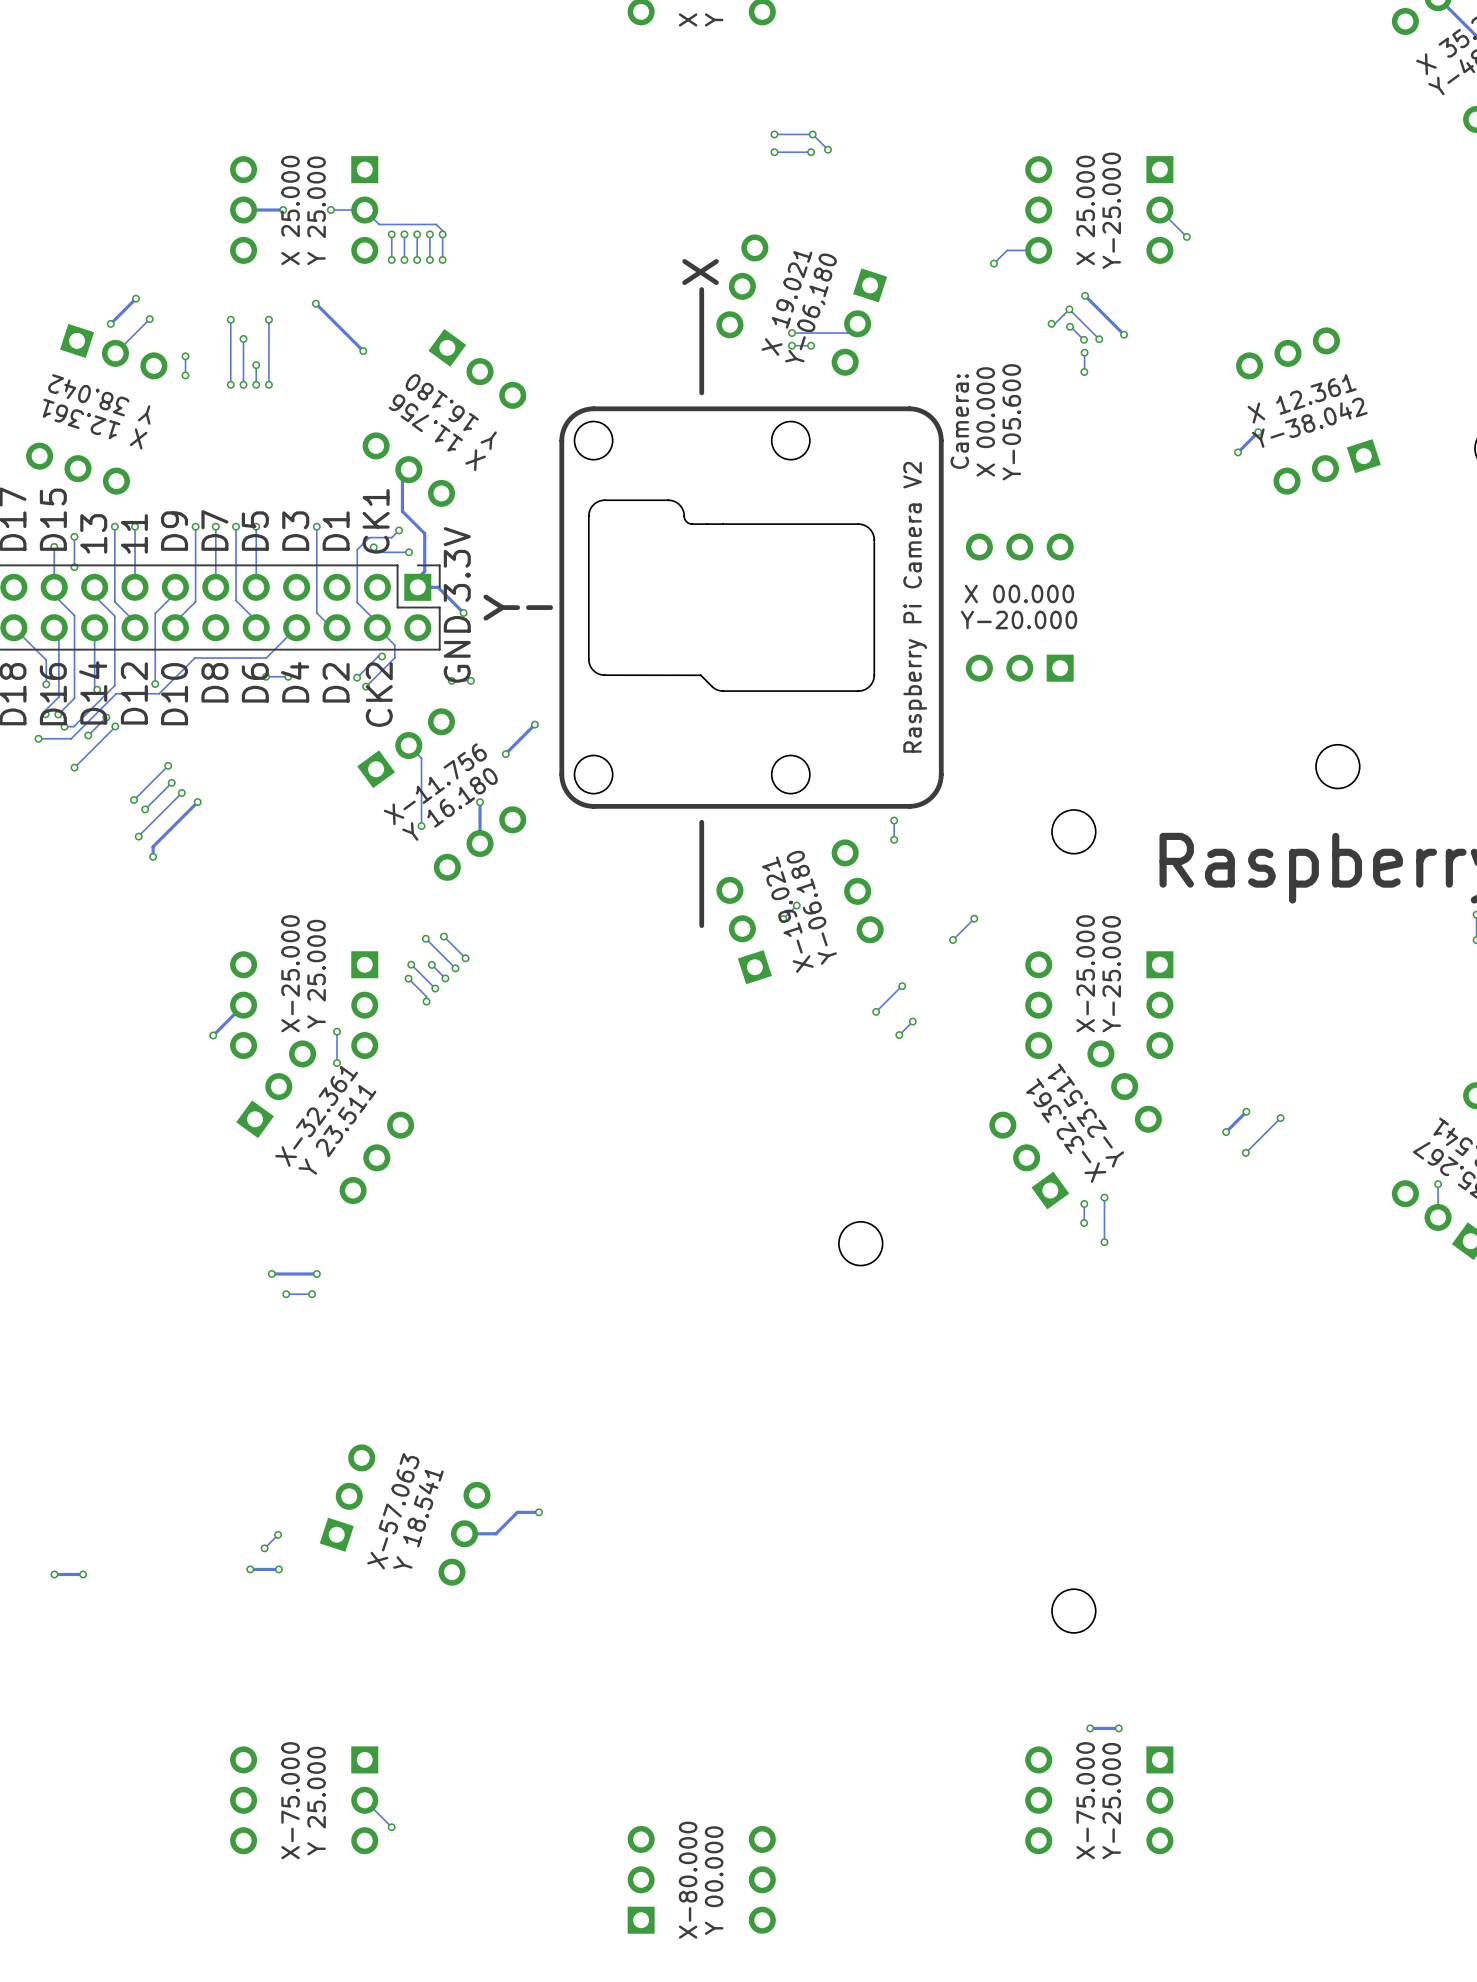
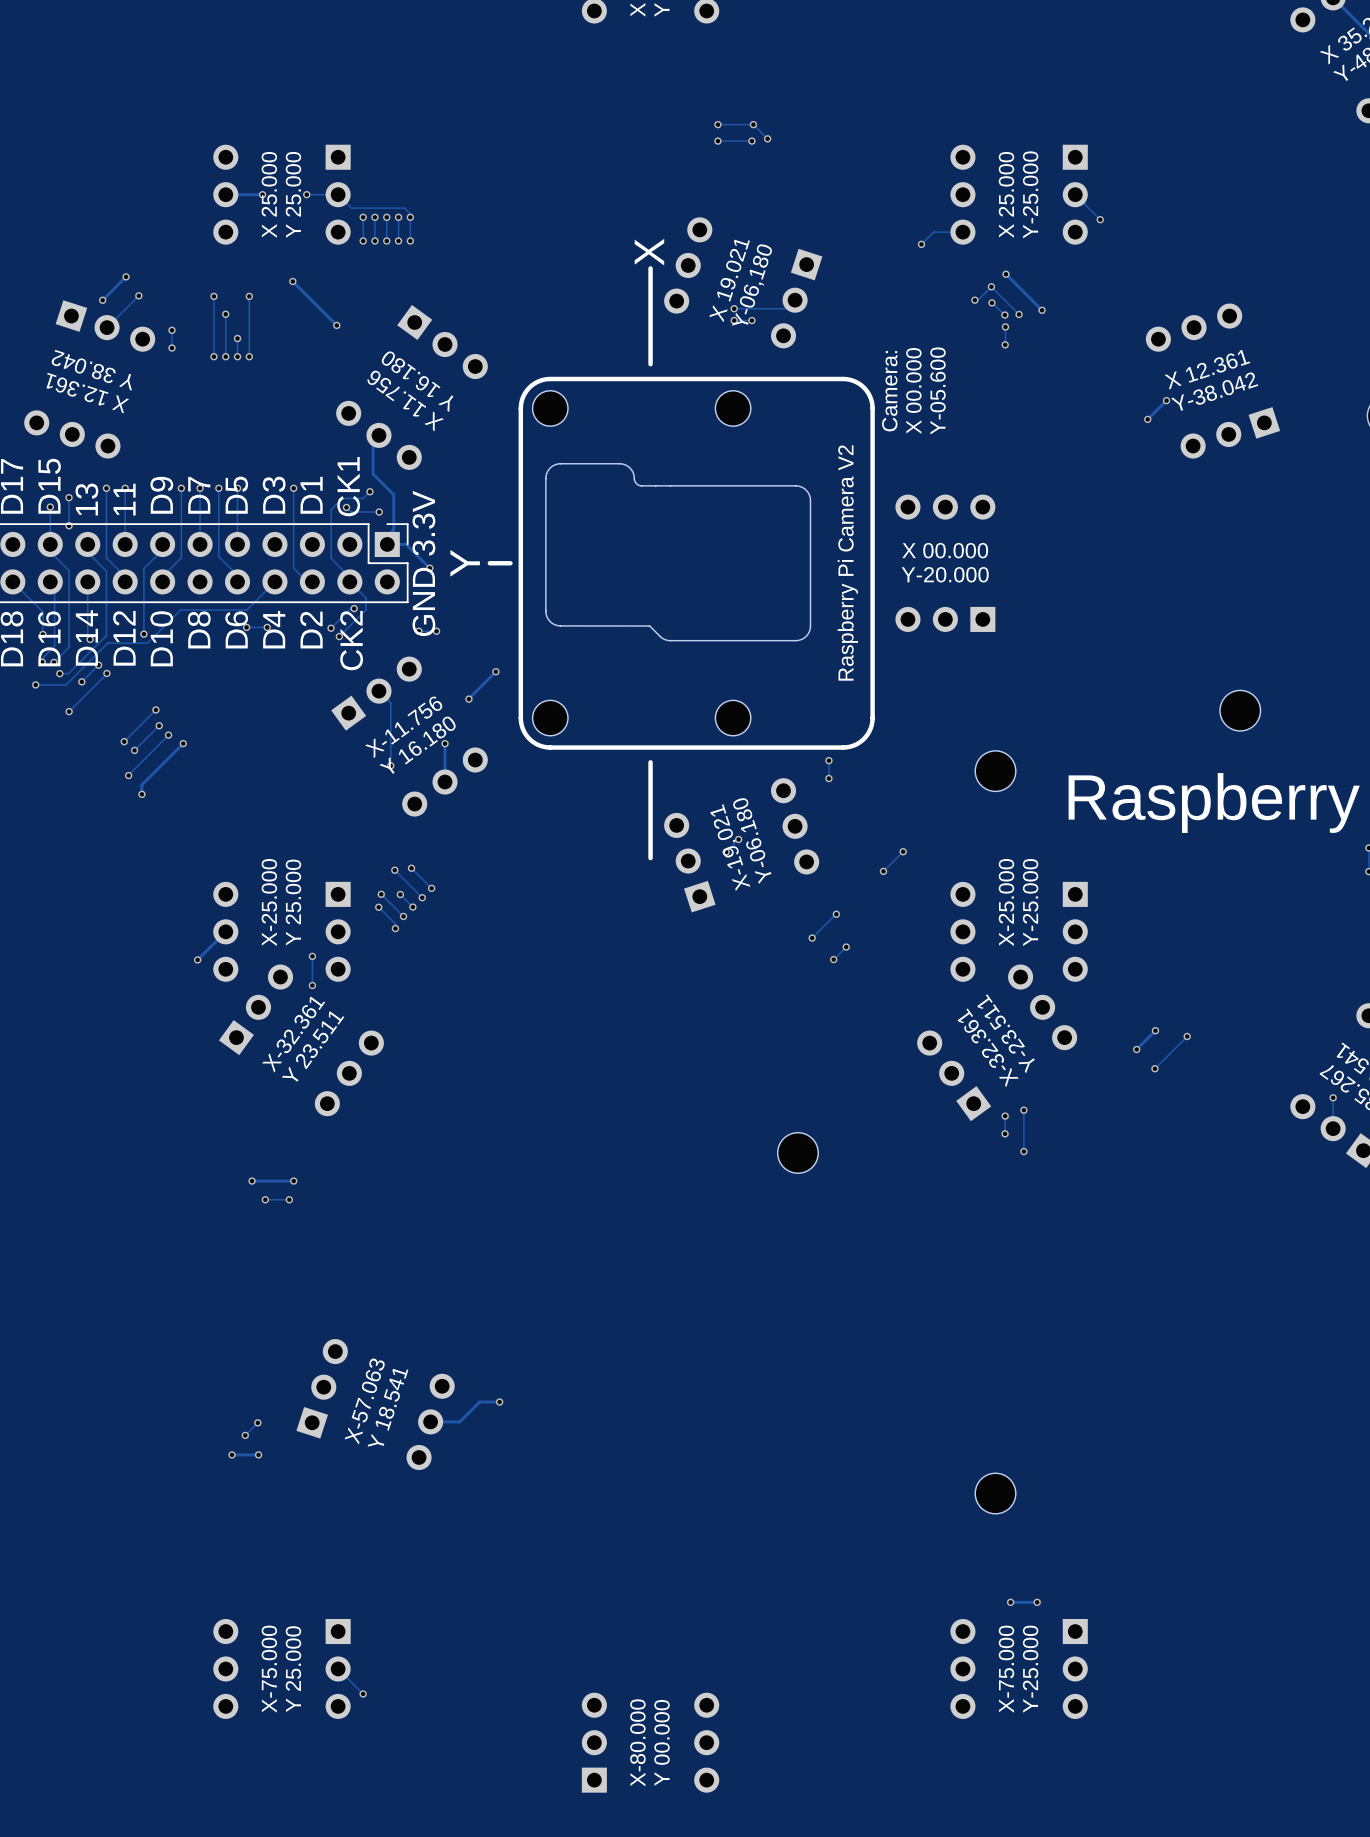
via: (54, 1574) -> none
track: (83, 1574) (54, 1574) -> none
via: (83, 1574) -> none

